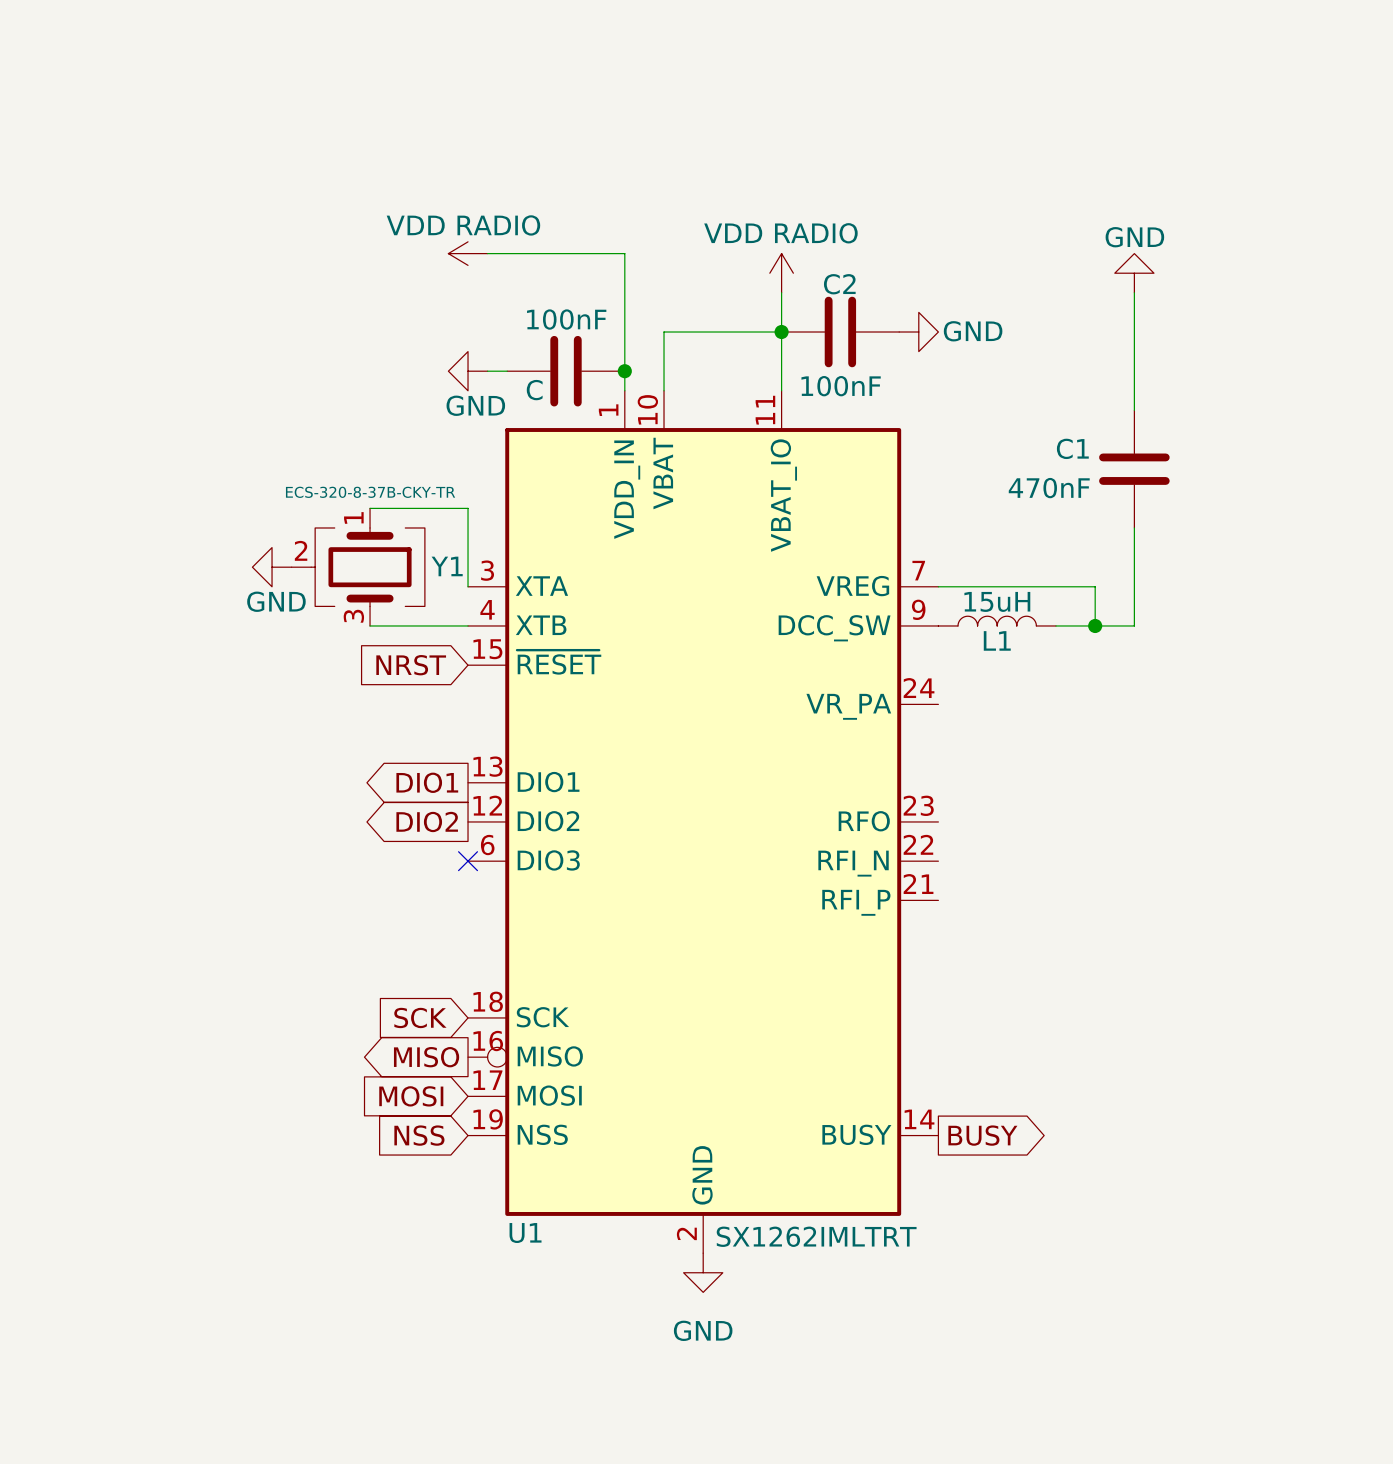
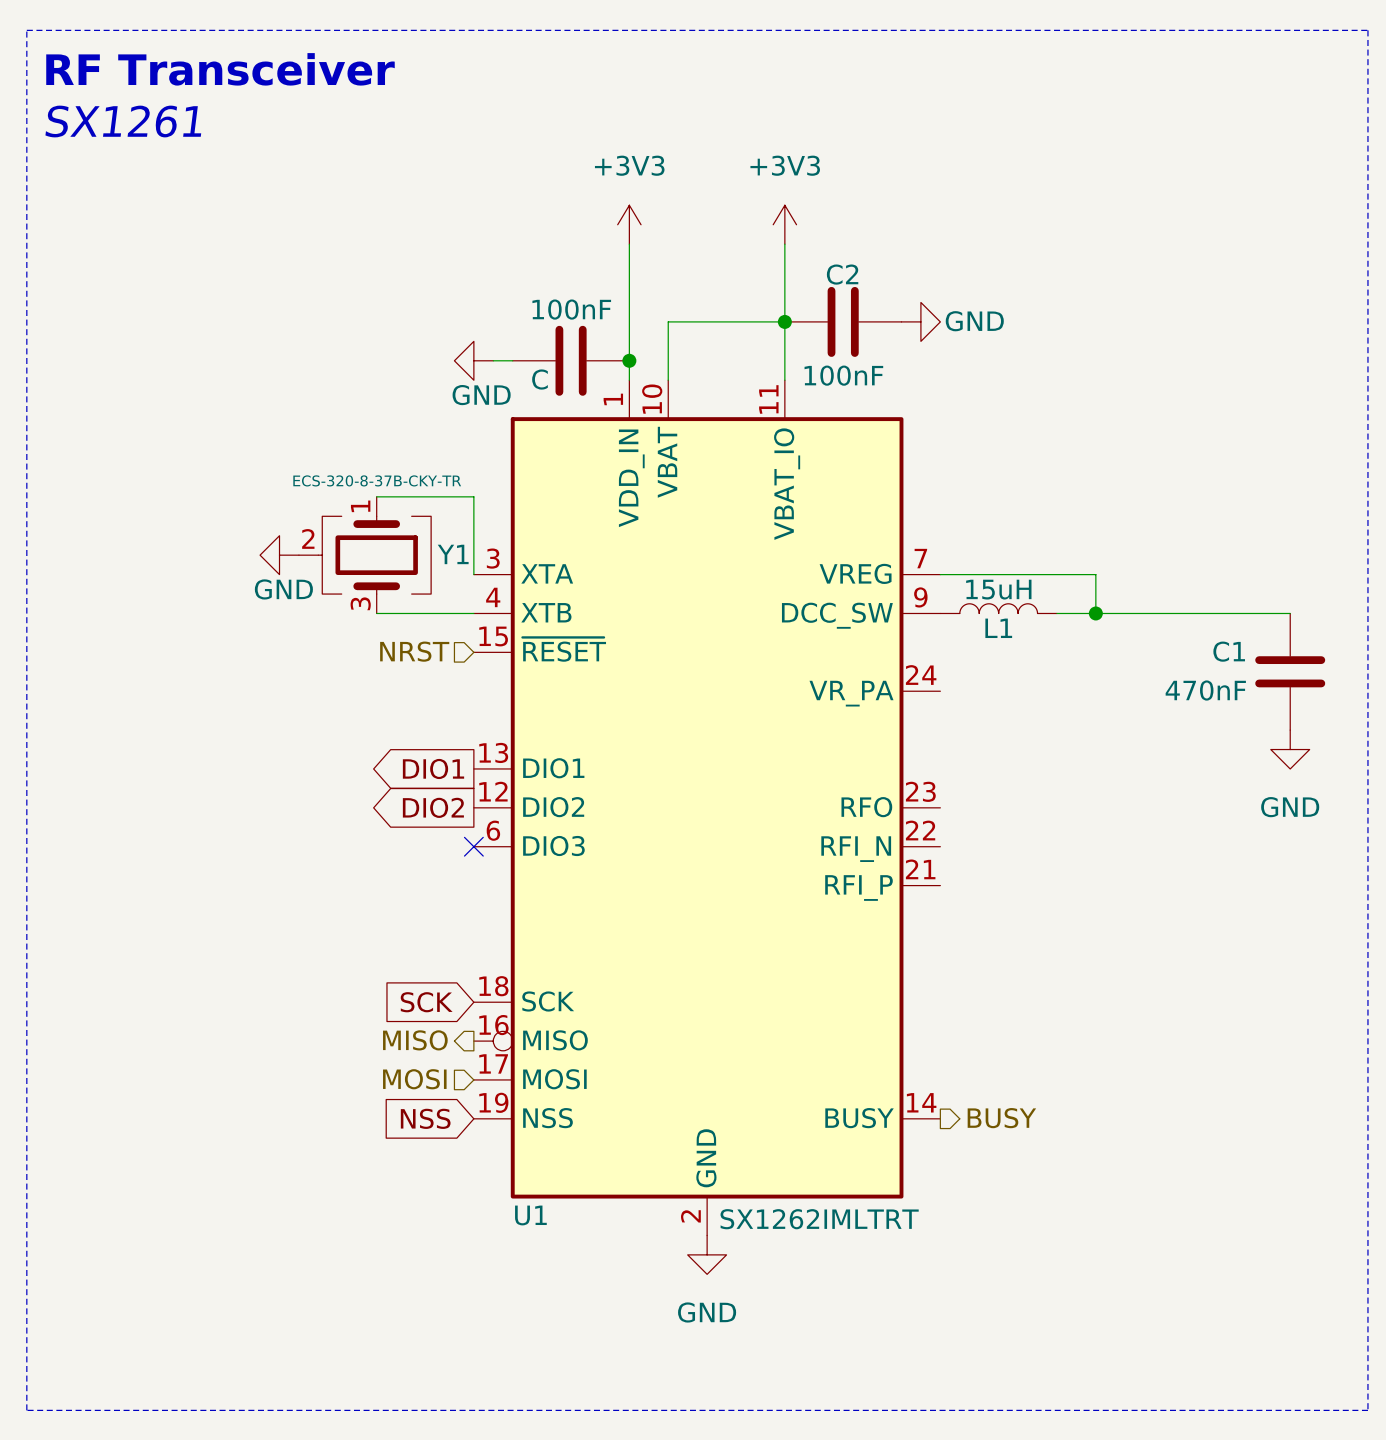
line: none -> (26, 30) (1367, 30) (1367, 1410) (26, 1410) (26, 30)
text: none -> RF Transceiver (220, 69)
text: none -> SX1261 (123, 121)
power symbol: none -> +3V3 (629, 224)
power symbol: none -> +3V3 (784, 224)
power symbol: VDD RADIO (468, 253) -> none
wire: (487, 253) (624, 253) -> none
power symbol: VDD RADIO (781, 273) -> none
power symbol: GND (1134, 273) -> none
wire: (1134, 292) (1134, 410) -> none
C1 position: (1134, 469) -> (1290, 671)
wire: (1134, 527) (1134, 625) -> (1290, 613) (1134, 613)
hierarchical label: none -> NRST (414, 651)
global label: NRST (411, 665) -> none
power symbol: none -> GND (1290, 749)
hierarchical label: none -> MISO (415, 1040)
global label: MISO (426, 1057) -> none
hierarchical label: none -> MOSI (414, 1079)
global label: MOSI (411, 1096) -> none
hierarchical label: none -> BUSY (1001, 1118)
global label: BUSY (982, 1135) -> none

